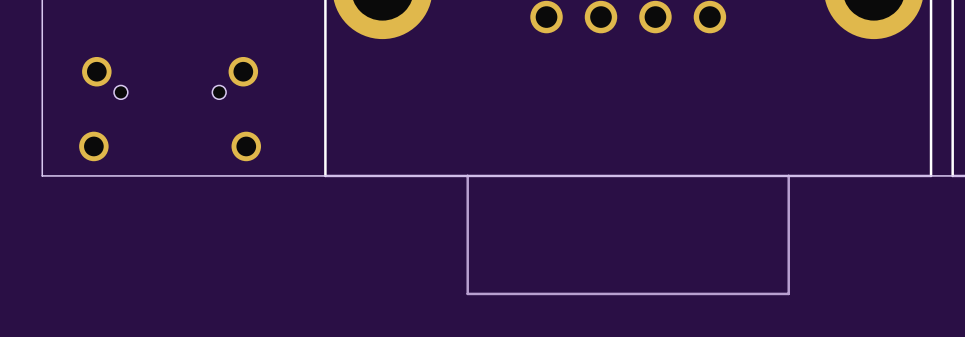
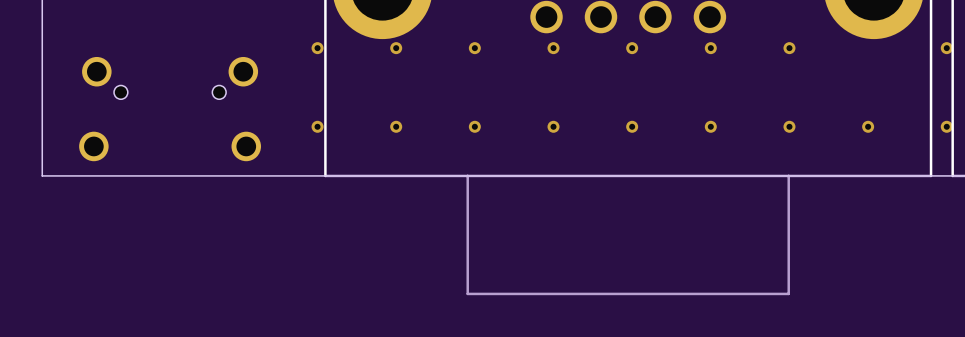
via: none -> (317, 48)
via: none -> (396, 48)
via: none -> (474, 48)
via: none -> (553, 48)
via: none -> (632, 48)
via: none -> (710, 48)
via: none -> (789, 48)
via: none -> (946, 48)
via: none -> (317, 126)
via: none -> (396, 126)
via: none -> (474, 126)
via: none -> (553, 126)
via: none -> (632, 126)
via: none -> (710, 126)
via: none -> (789, 126)
via: none -> (868, 126)
via: none -> (946, 126)

